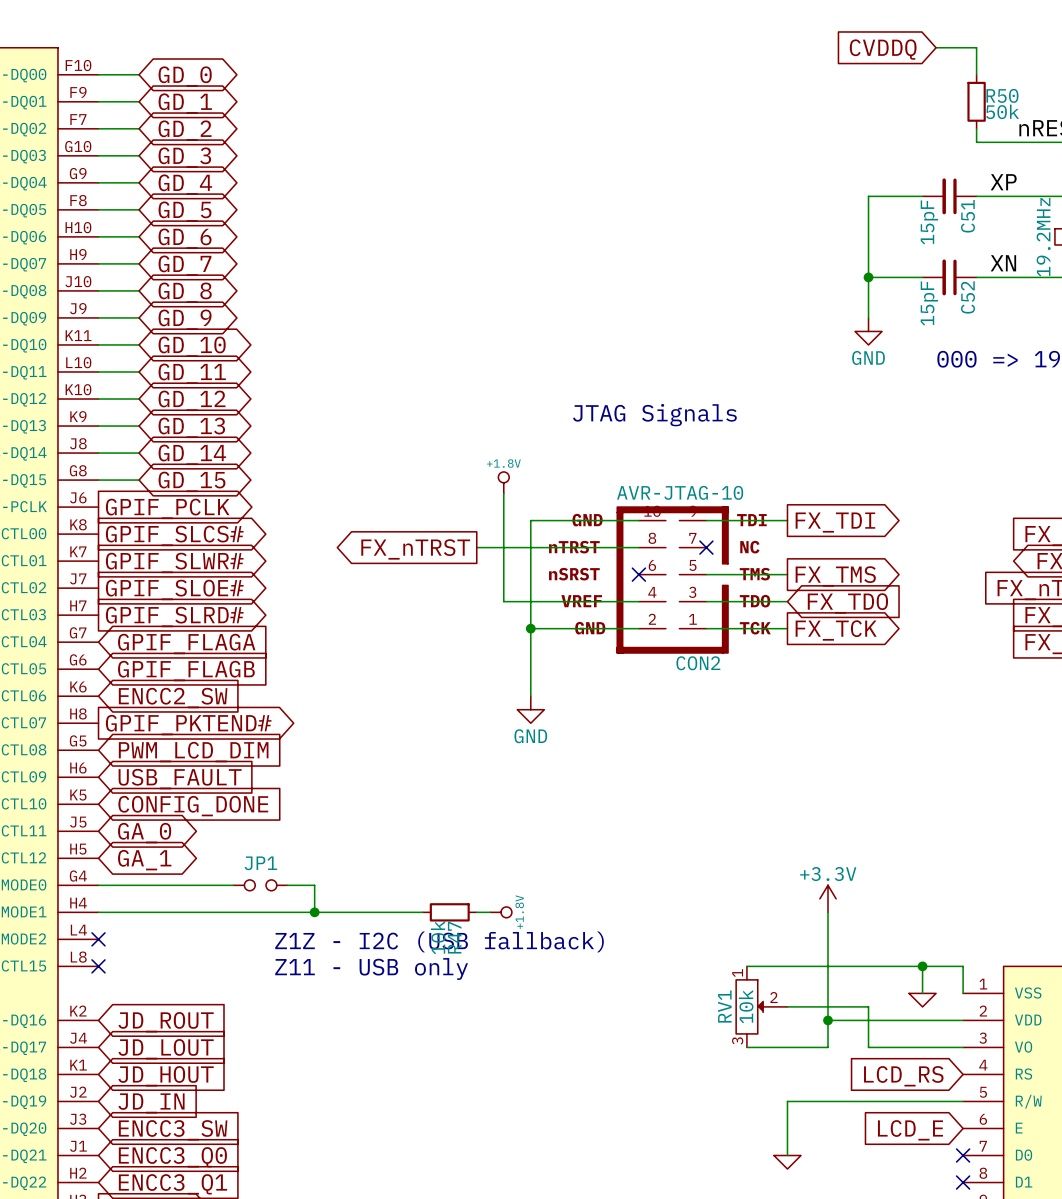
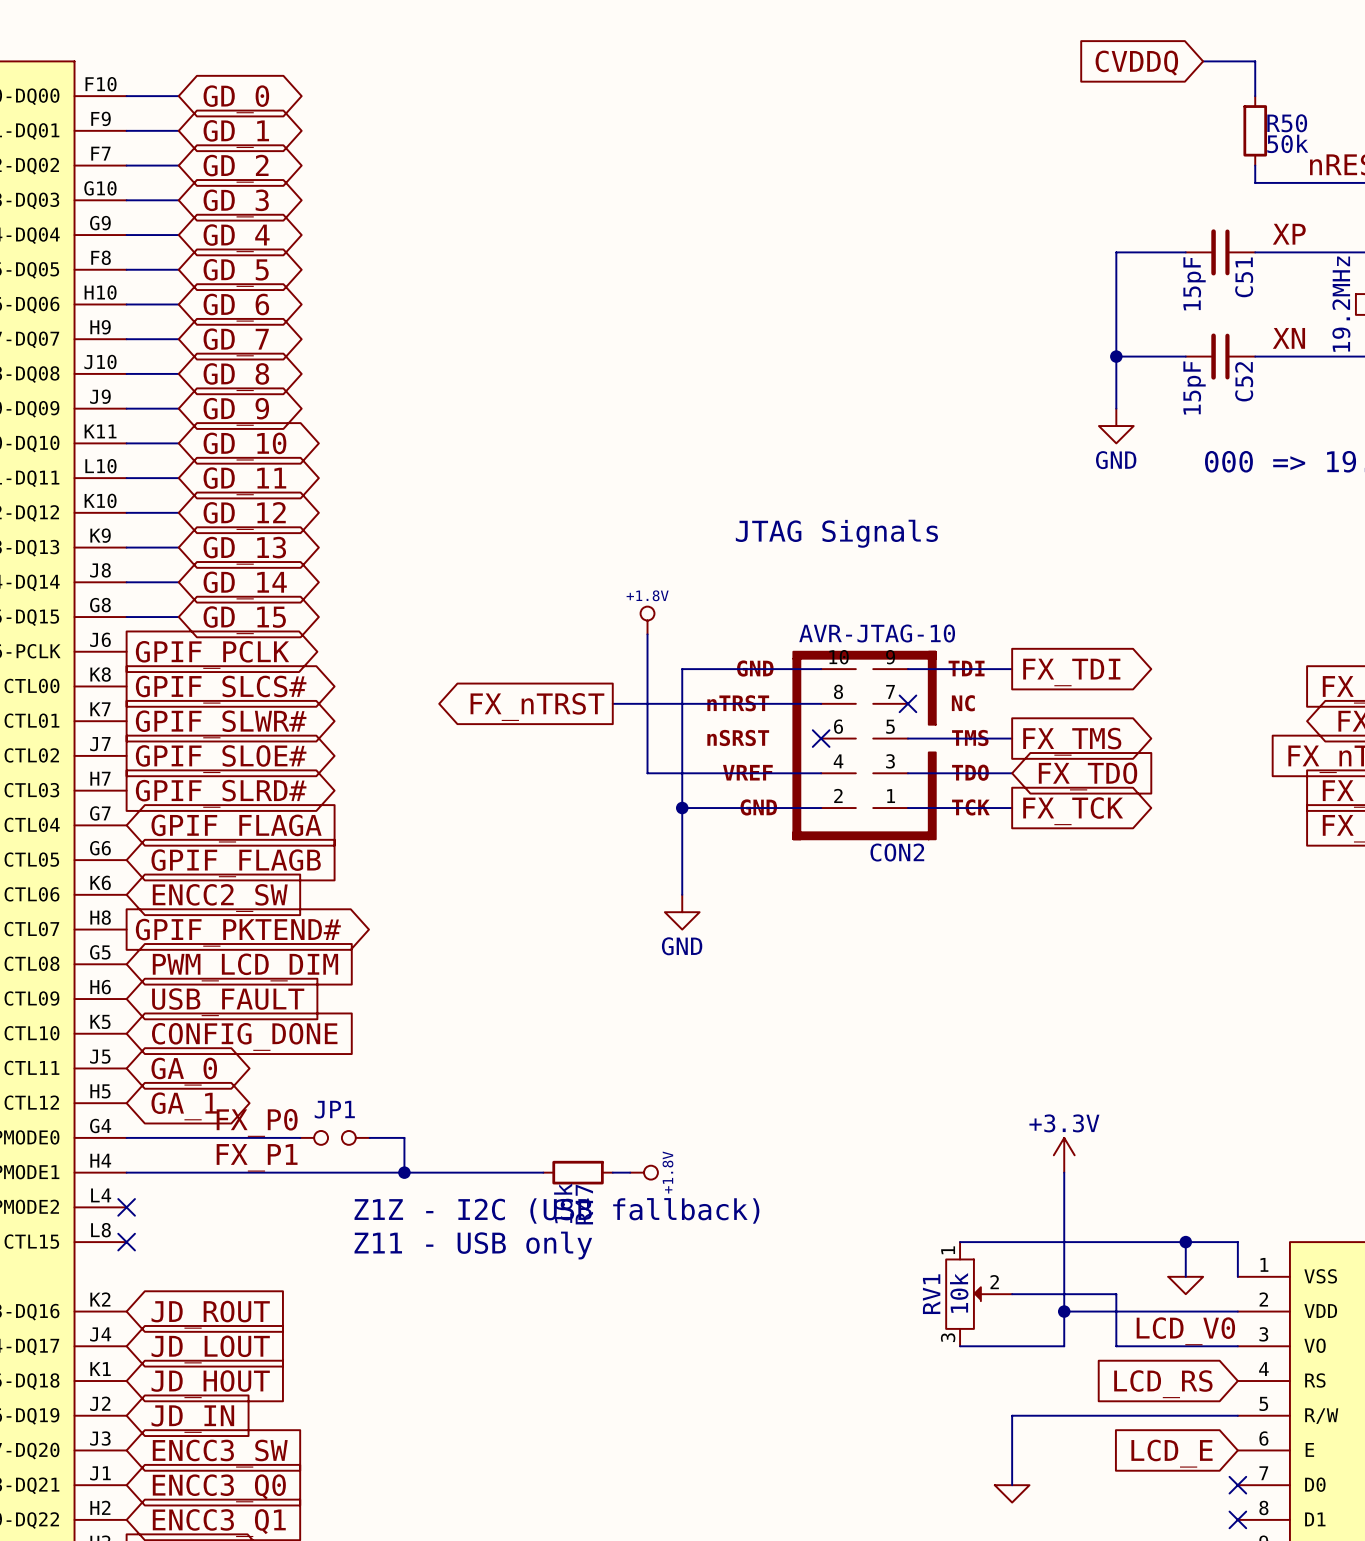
label: none -> FX_P0 (257, 1122)
label: none -> FX_P1 (257, 1157)
label: none -> LCD_V0 (1185, 1331)

